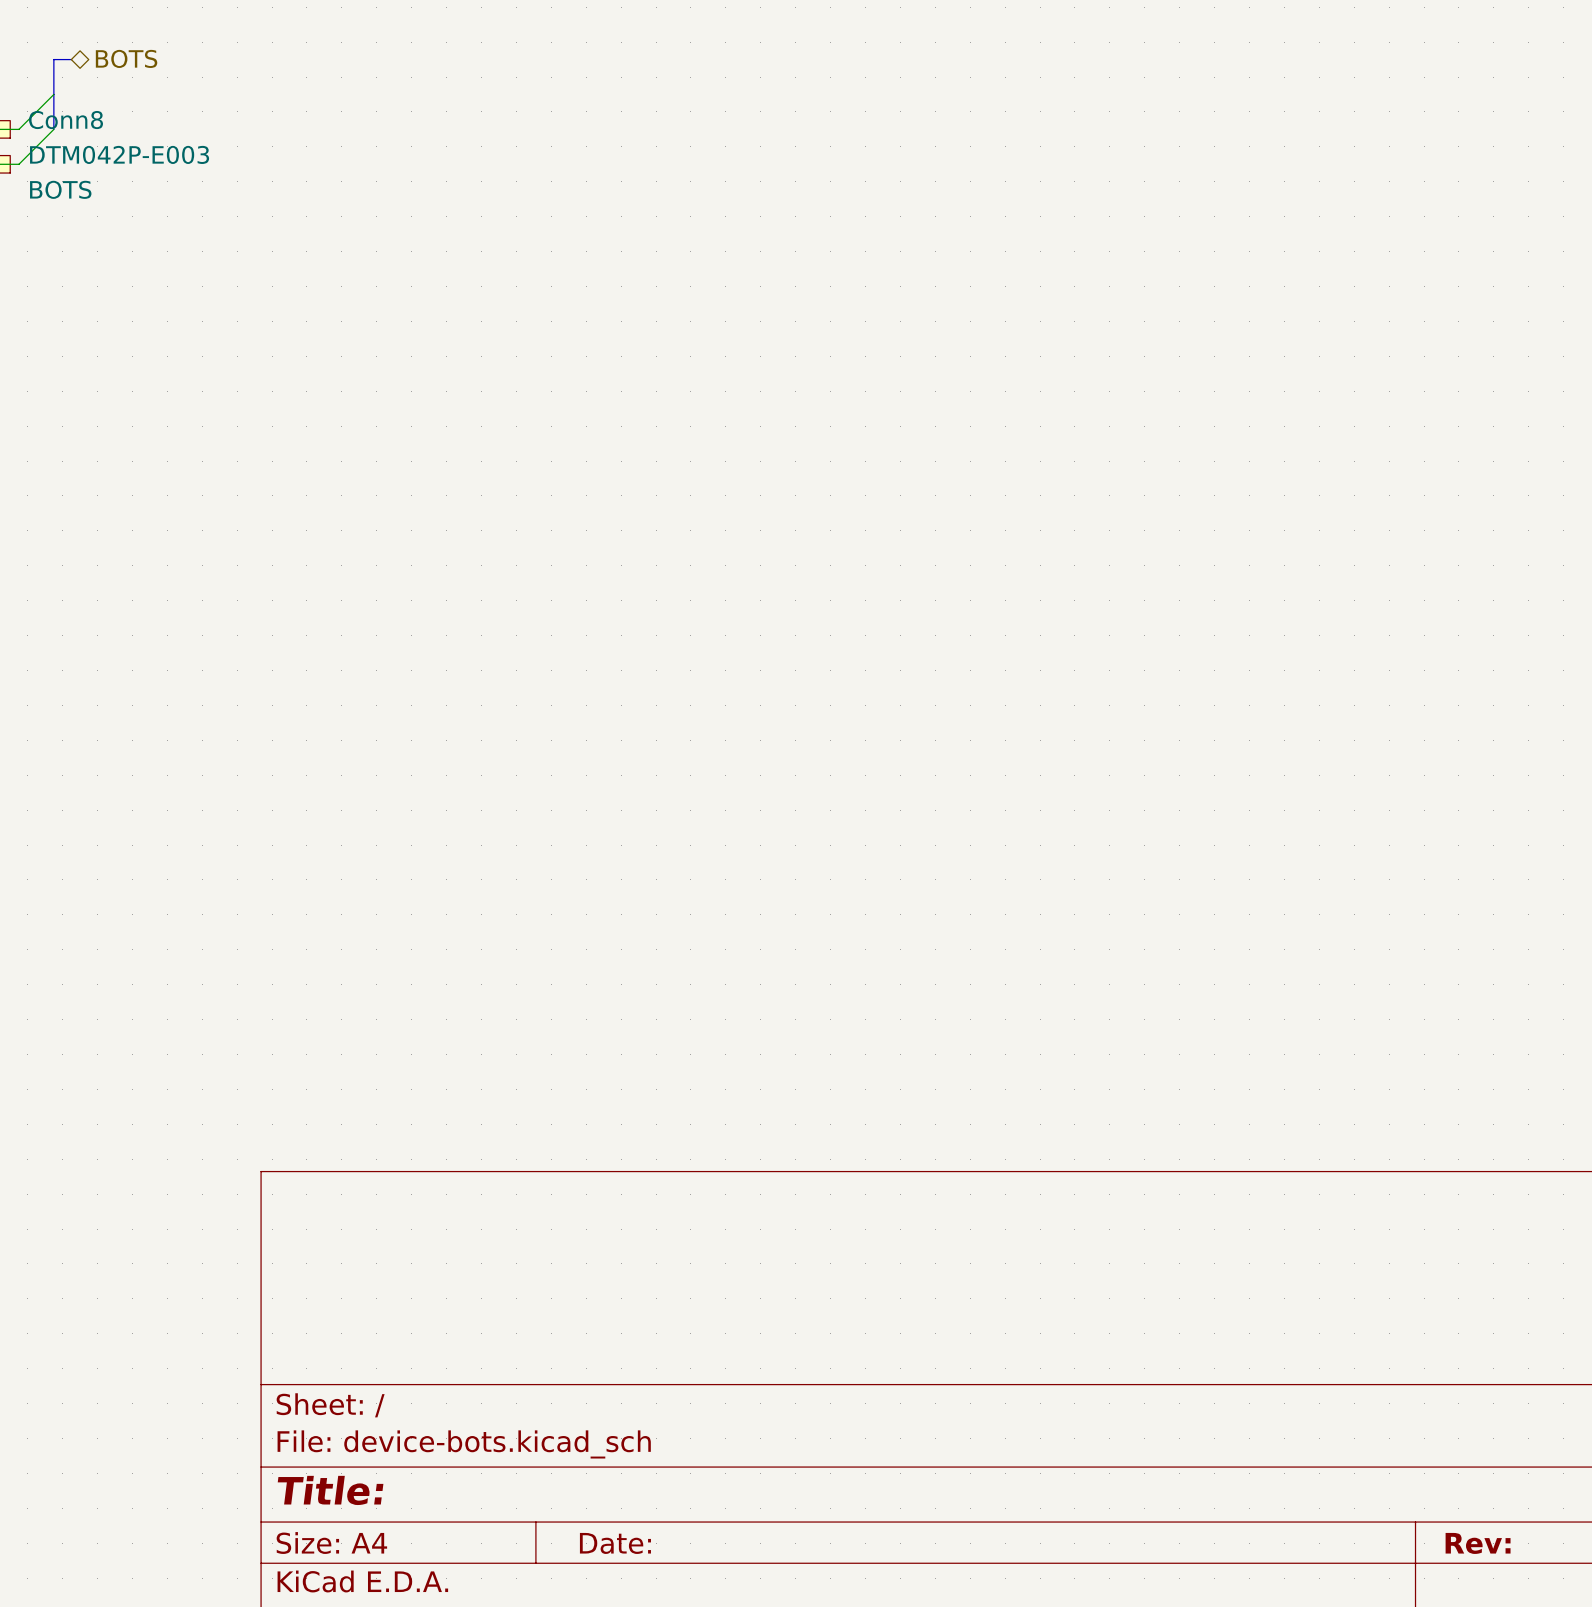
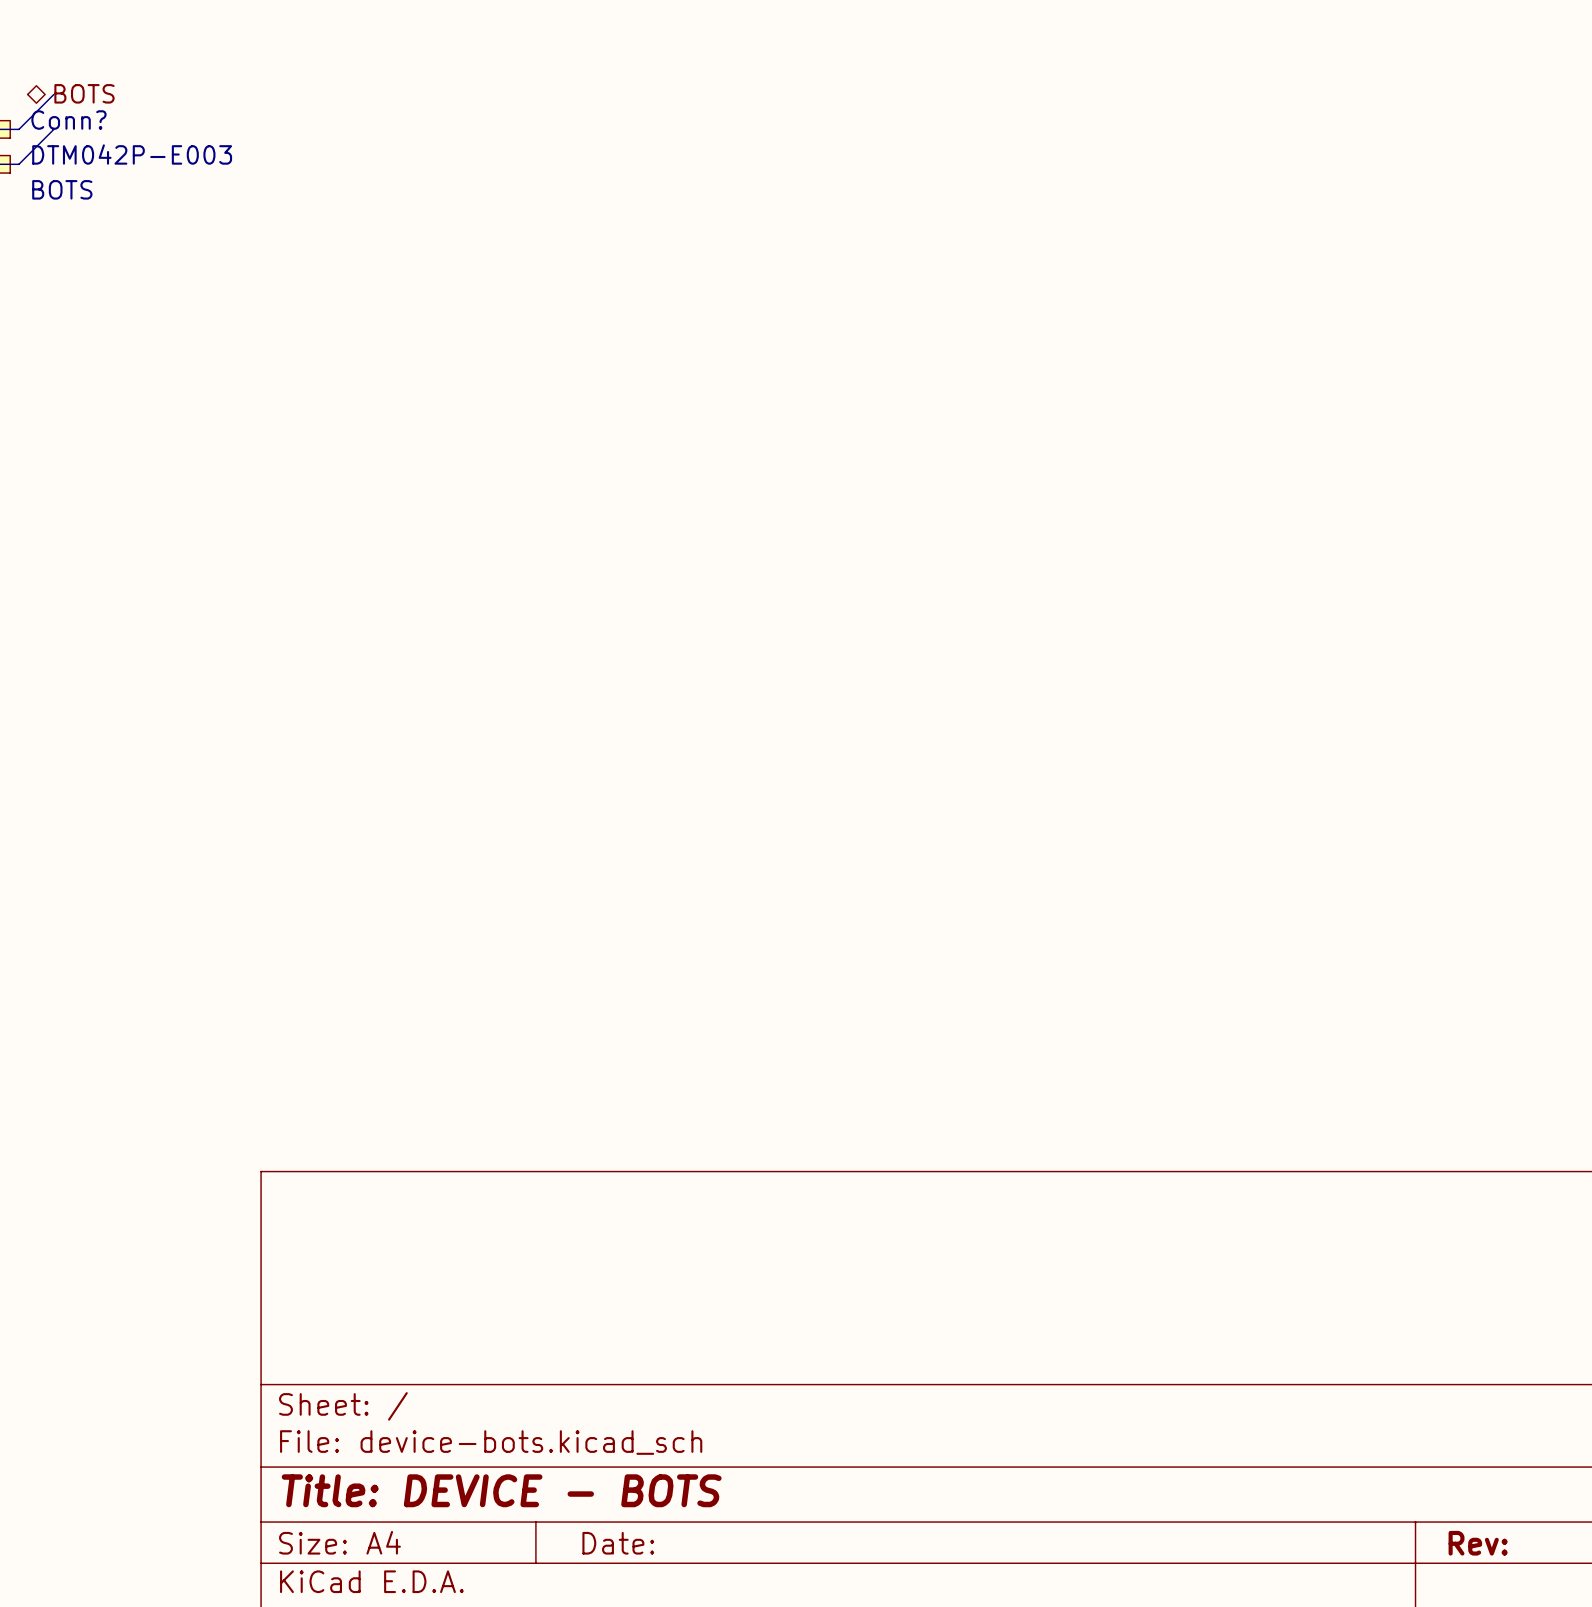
hierarchical label position: BOTS (126, 58) -> BOTS (84, 93)
bus: (71, 59) (53, 59) (53, 129) -> none
Conn8 name: Conn8 (66, 120) -> Conn? (68, 120)
title block: Title: (330, 1490) -> Title: DEVICE - BOTS (501, 1490)

